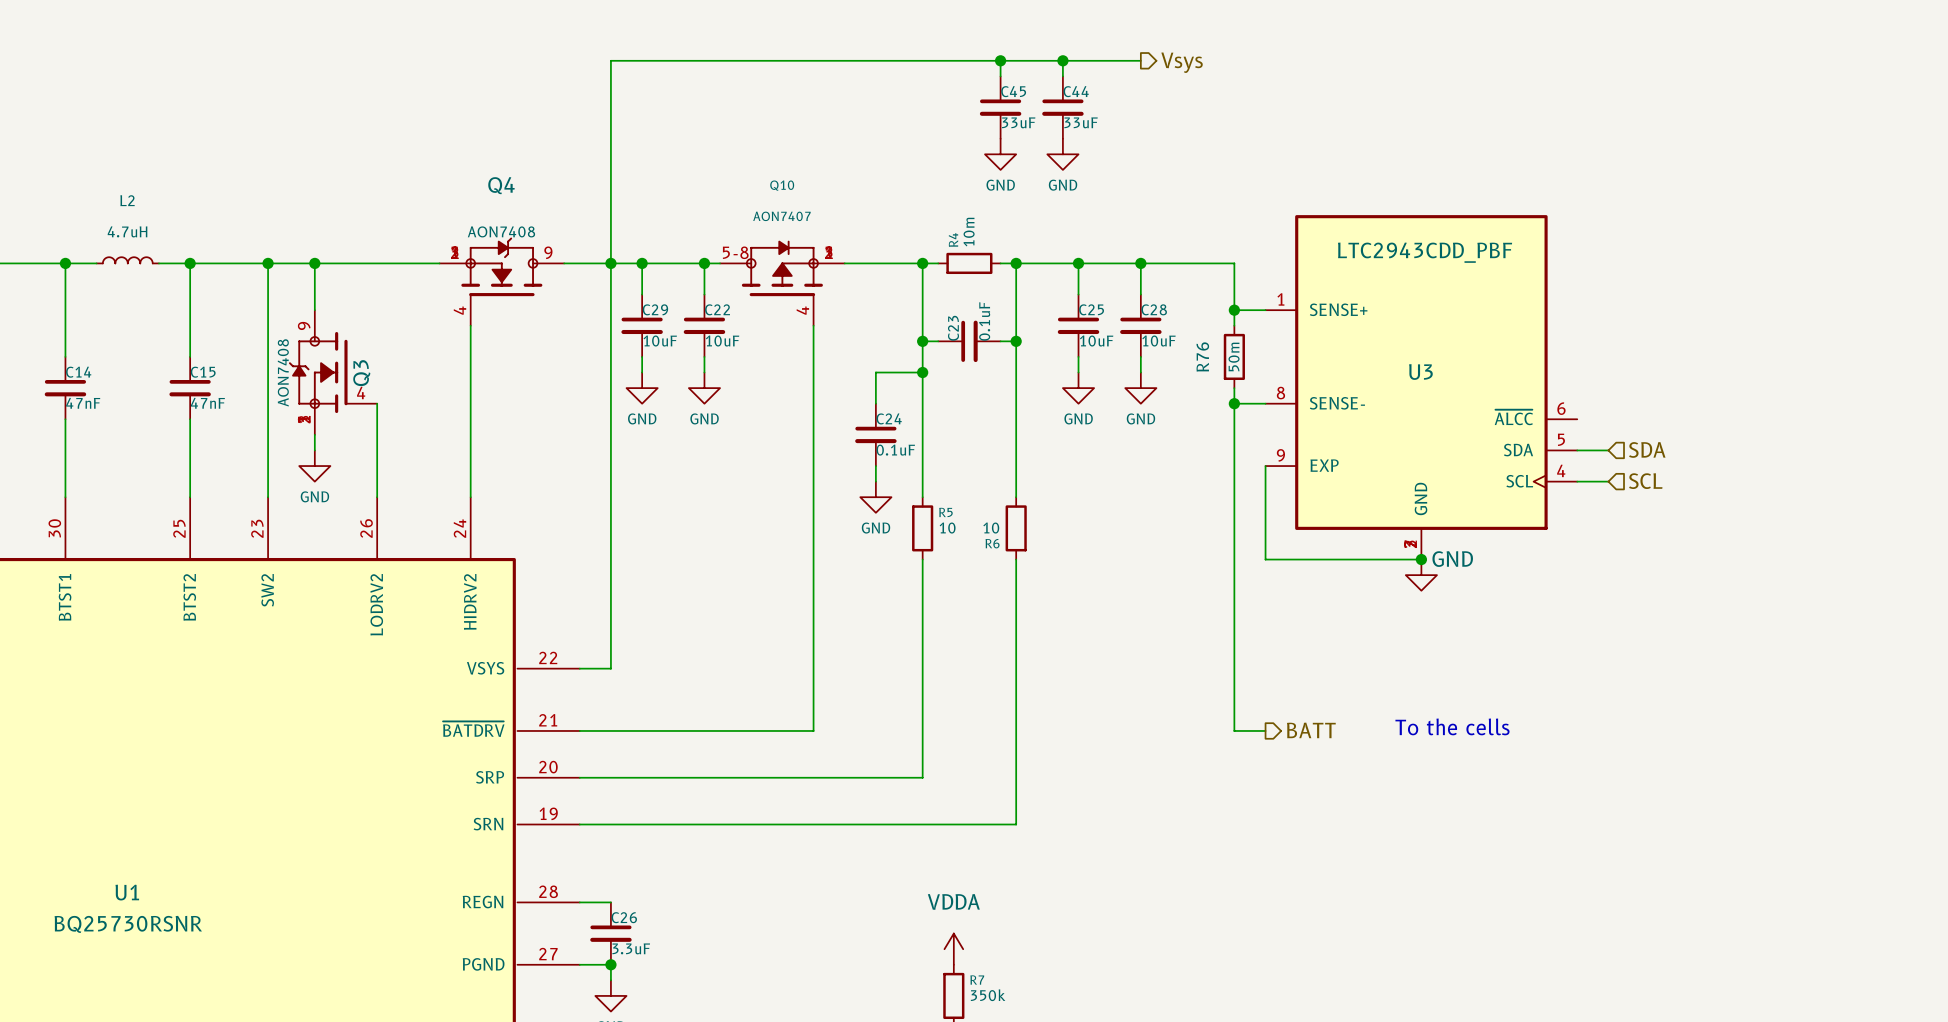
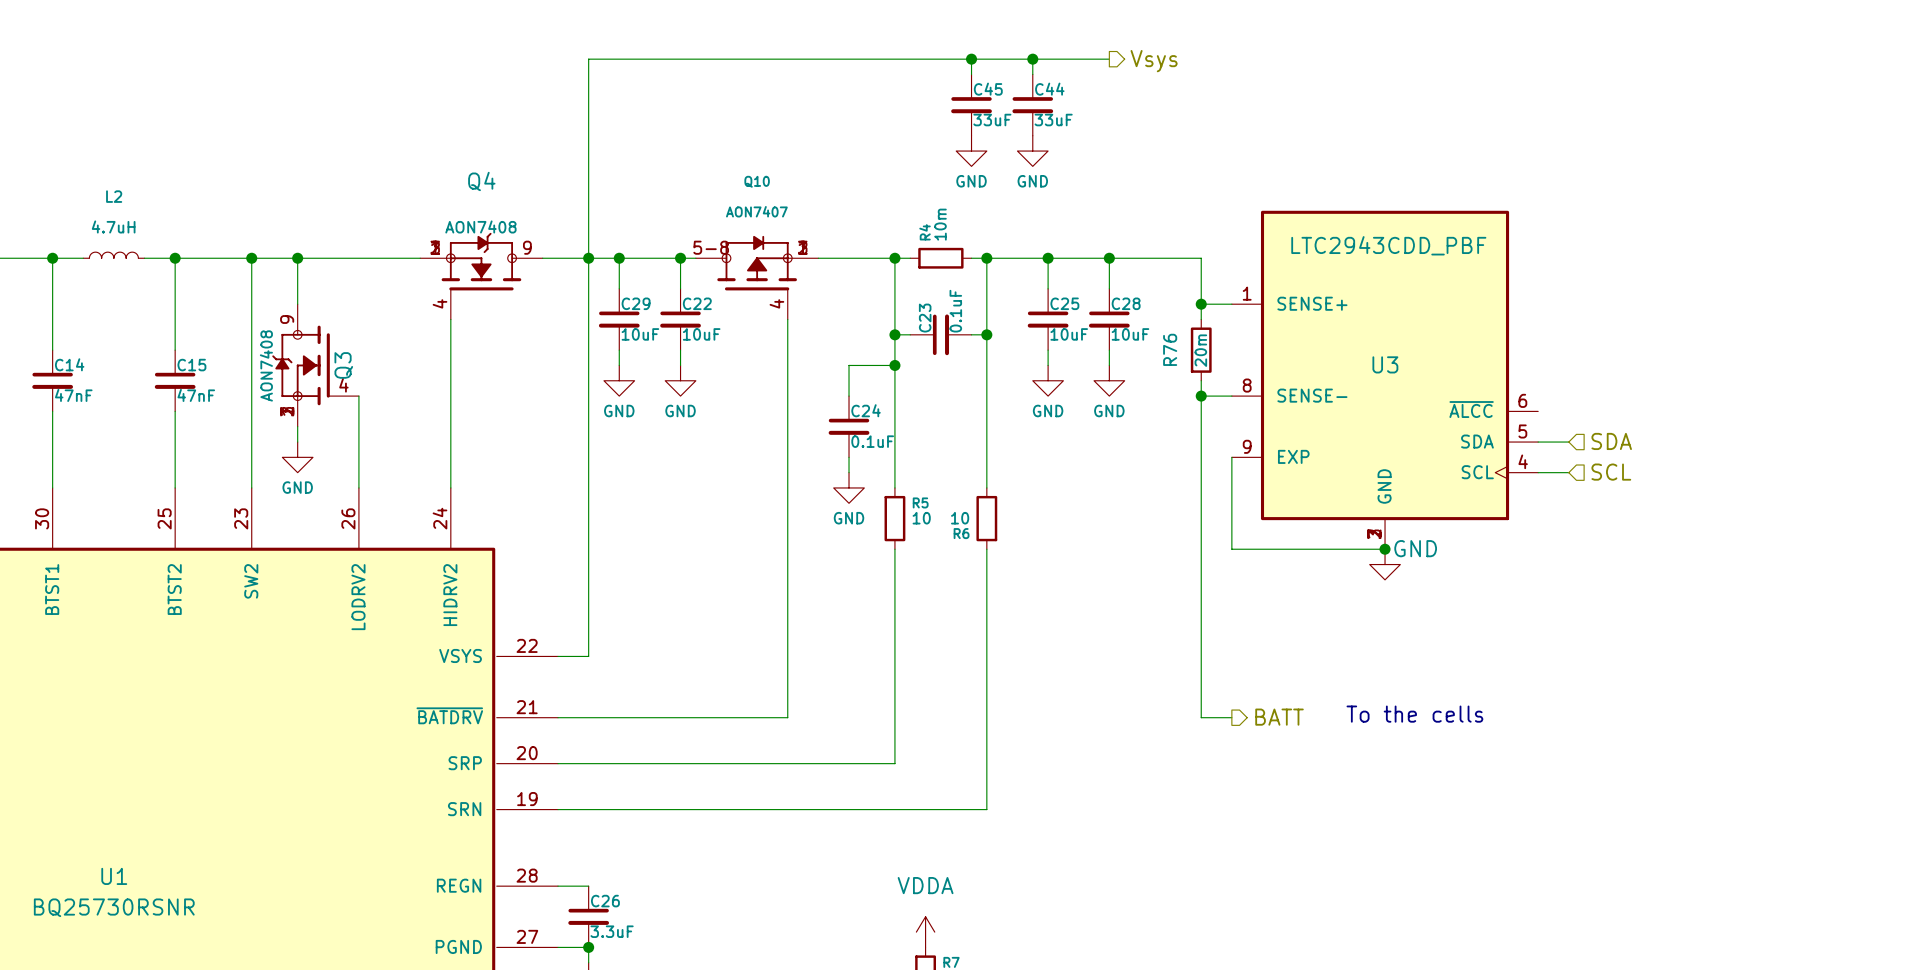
R76 value: 50m (1234, 356) -> 20m (1200, 350)

